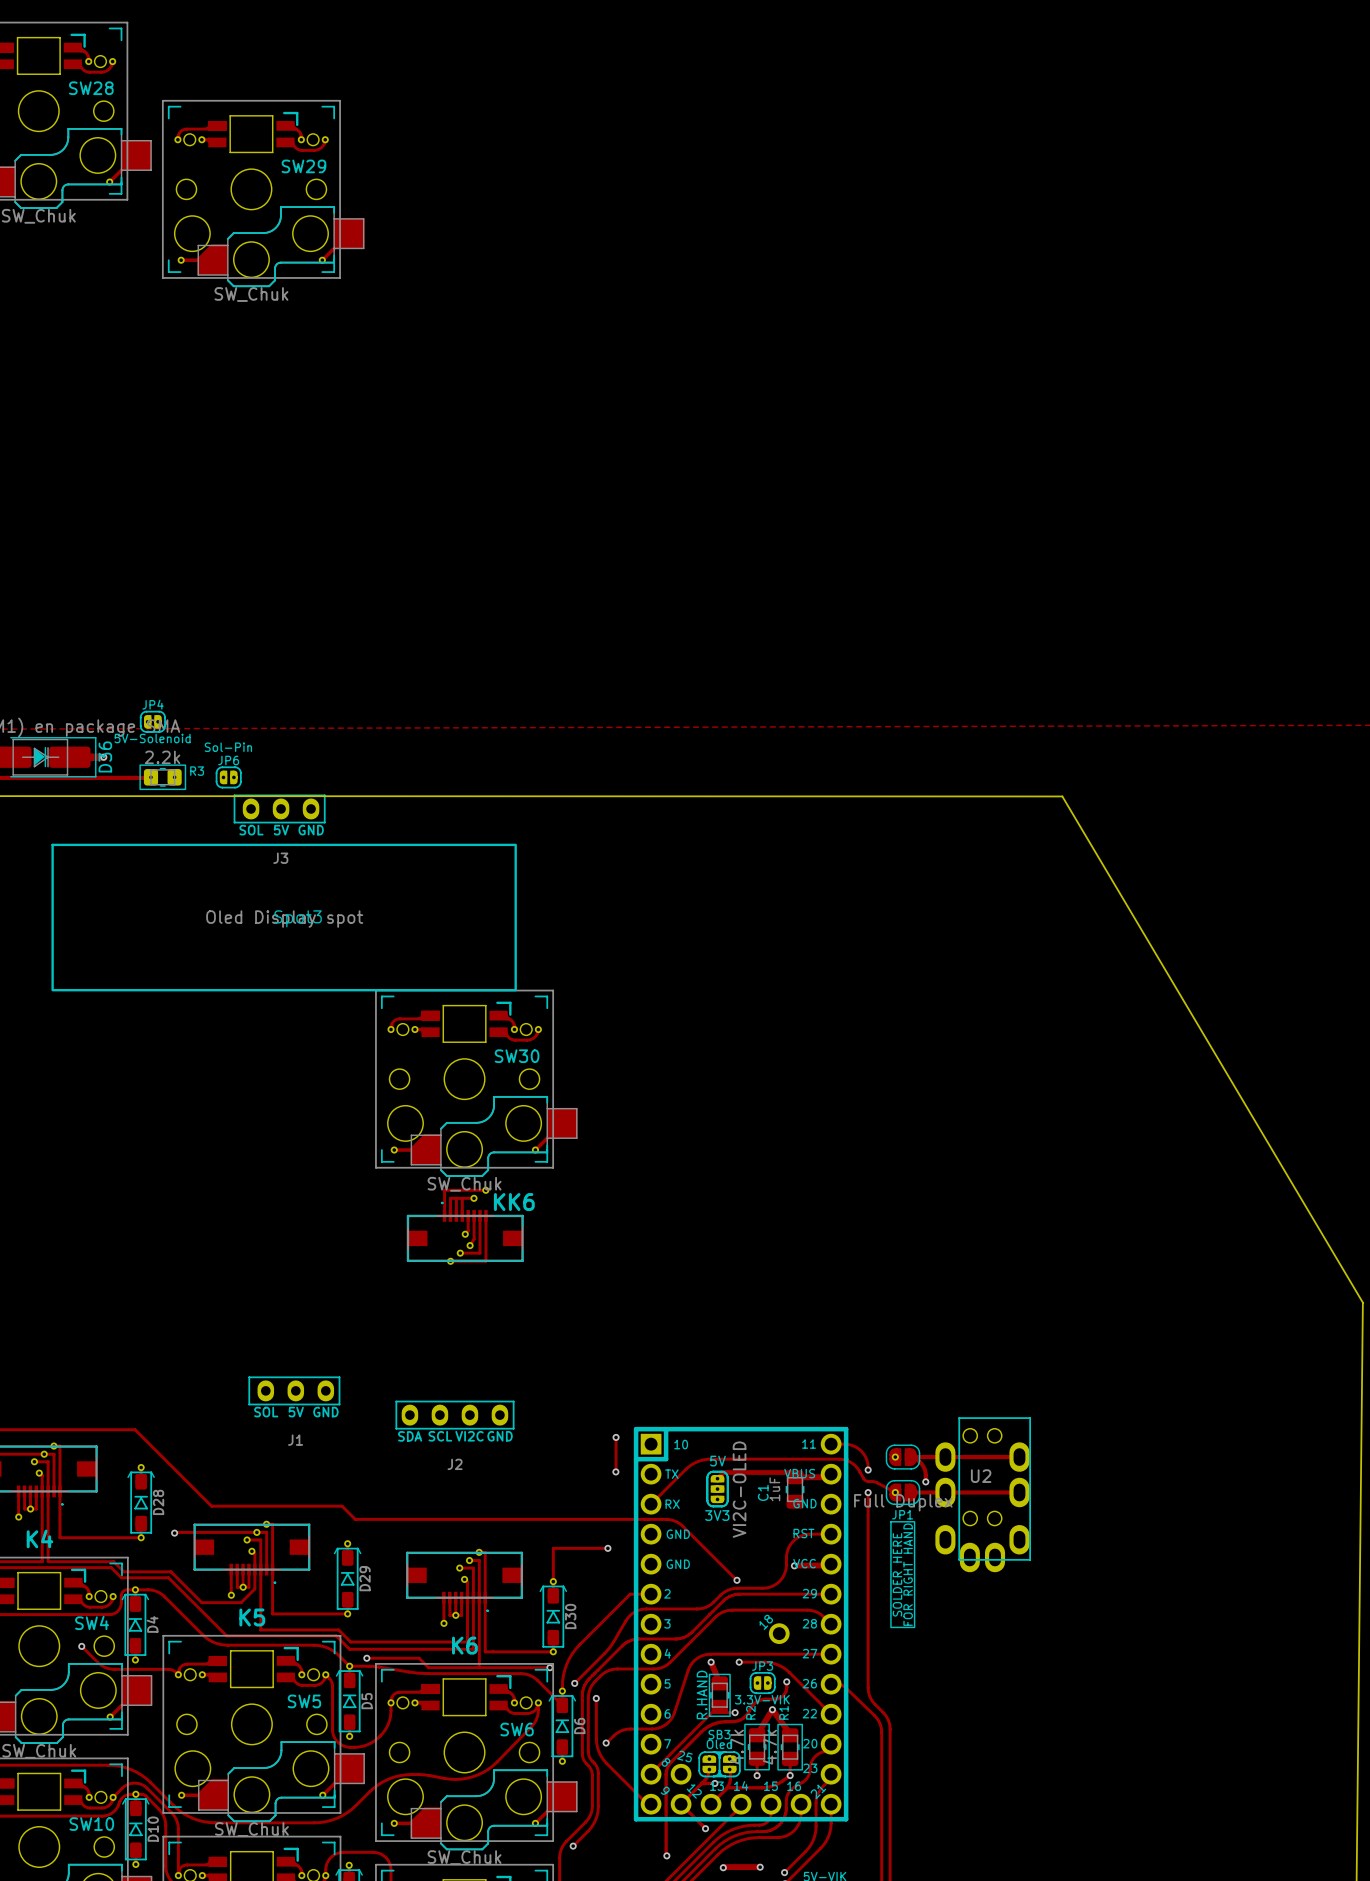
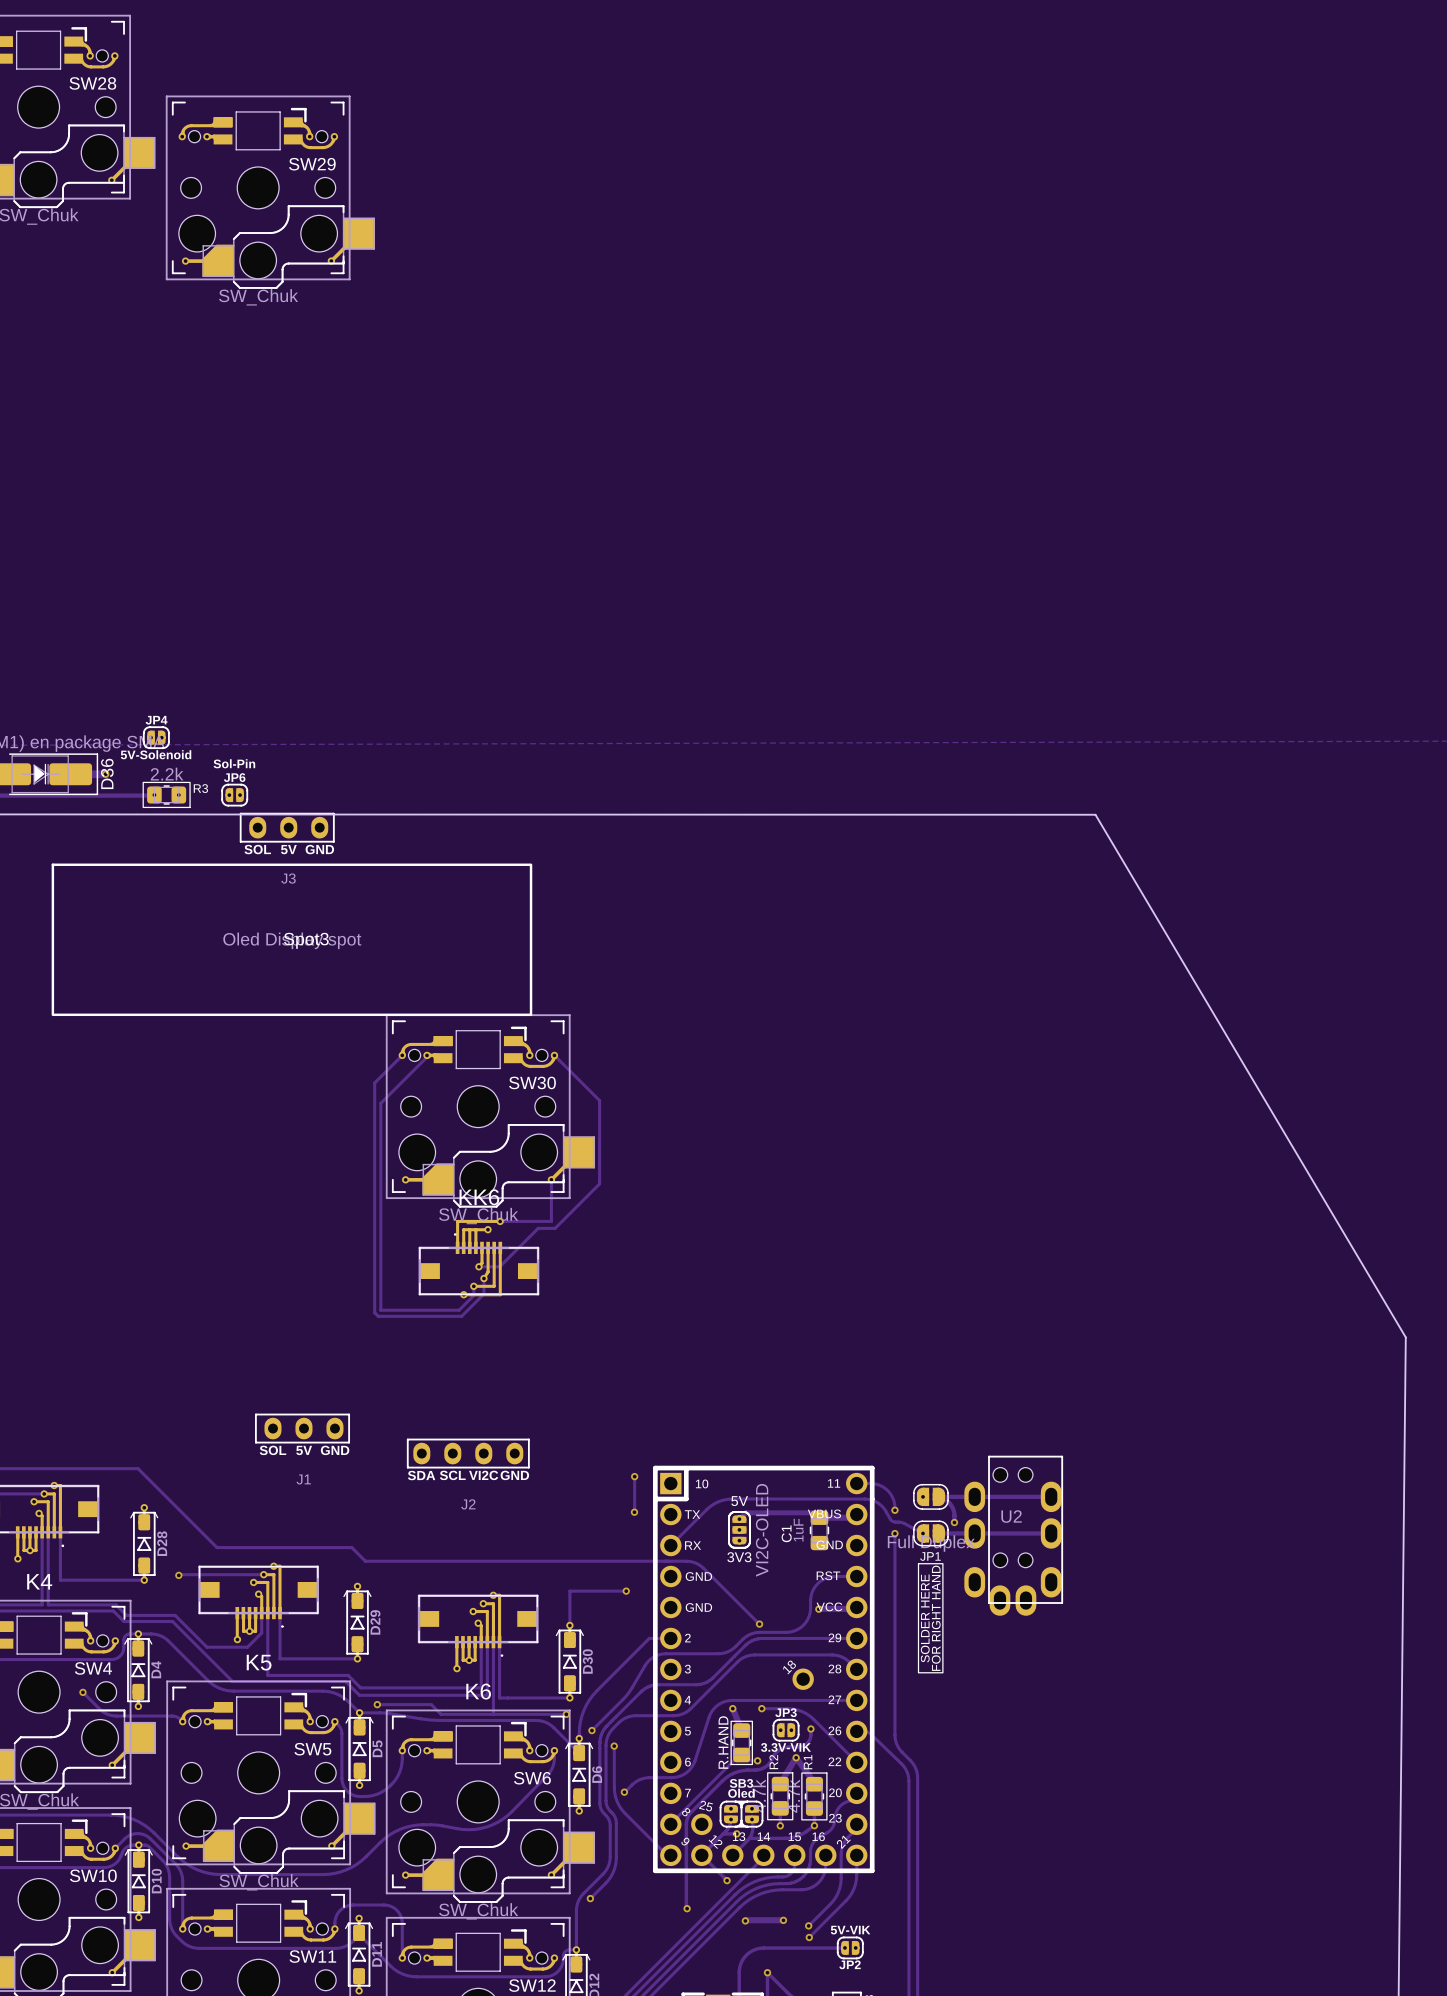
track: none -> (402, 1055) (374, 1082) (374, 1312) (378, 1316) (461, 1316) (483, 1294) (483, 1278)
track: none -> (426, 1055) (380, 1103) (380, 1310) (459, 1310) (473, 1295) (473, 1286)
track: none -> (554, 1055) (599, 1100) (599, 1183) (555, 1228) (538, 1228) (499, 1266) (478, 1266)
track: none -> (551, 1179) (551, 1221) (500, 1221)
KK6 name position: KK6 (514, 1202) -> KK6 (479, 1197)

